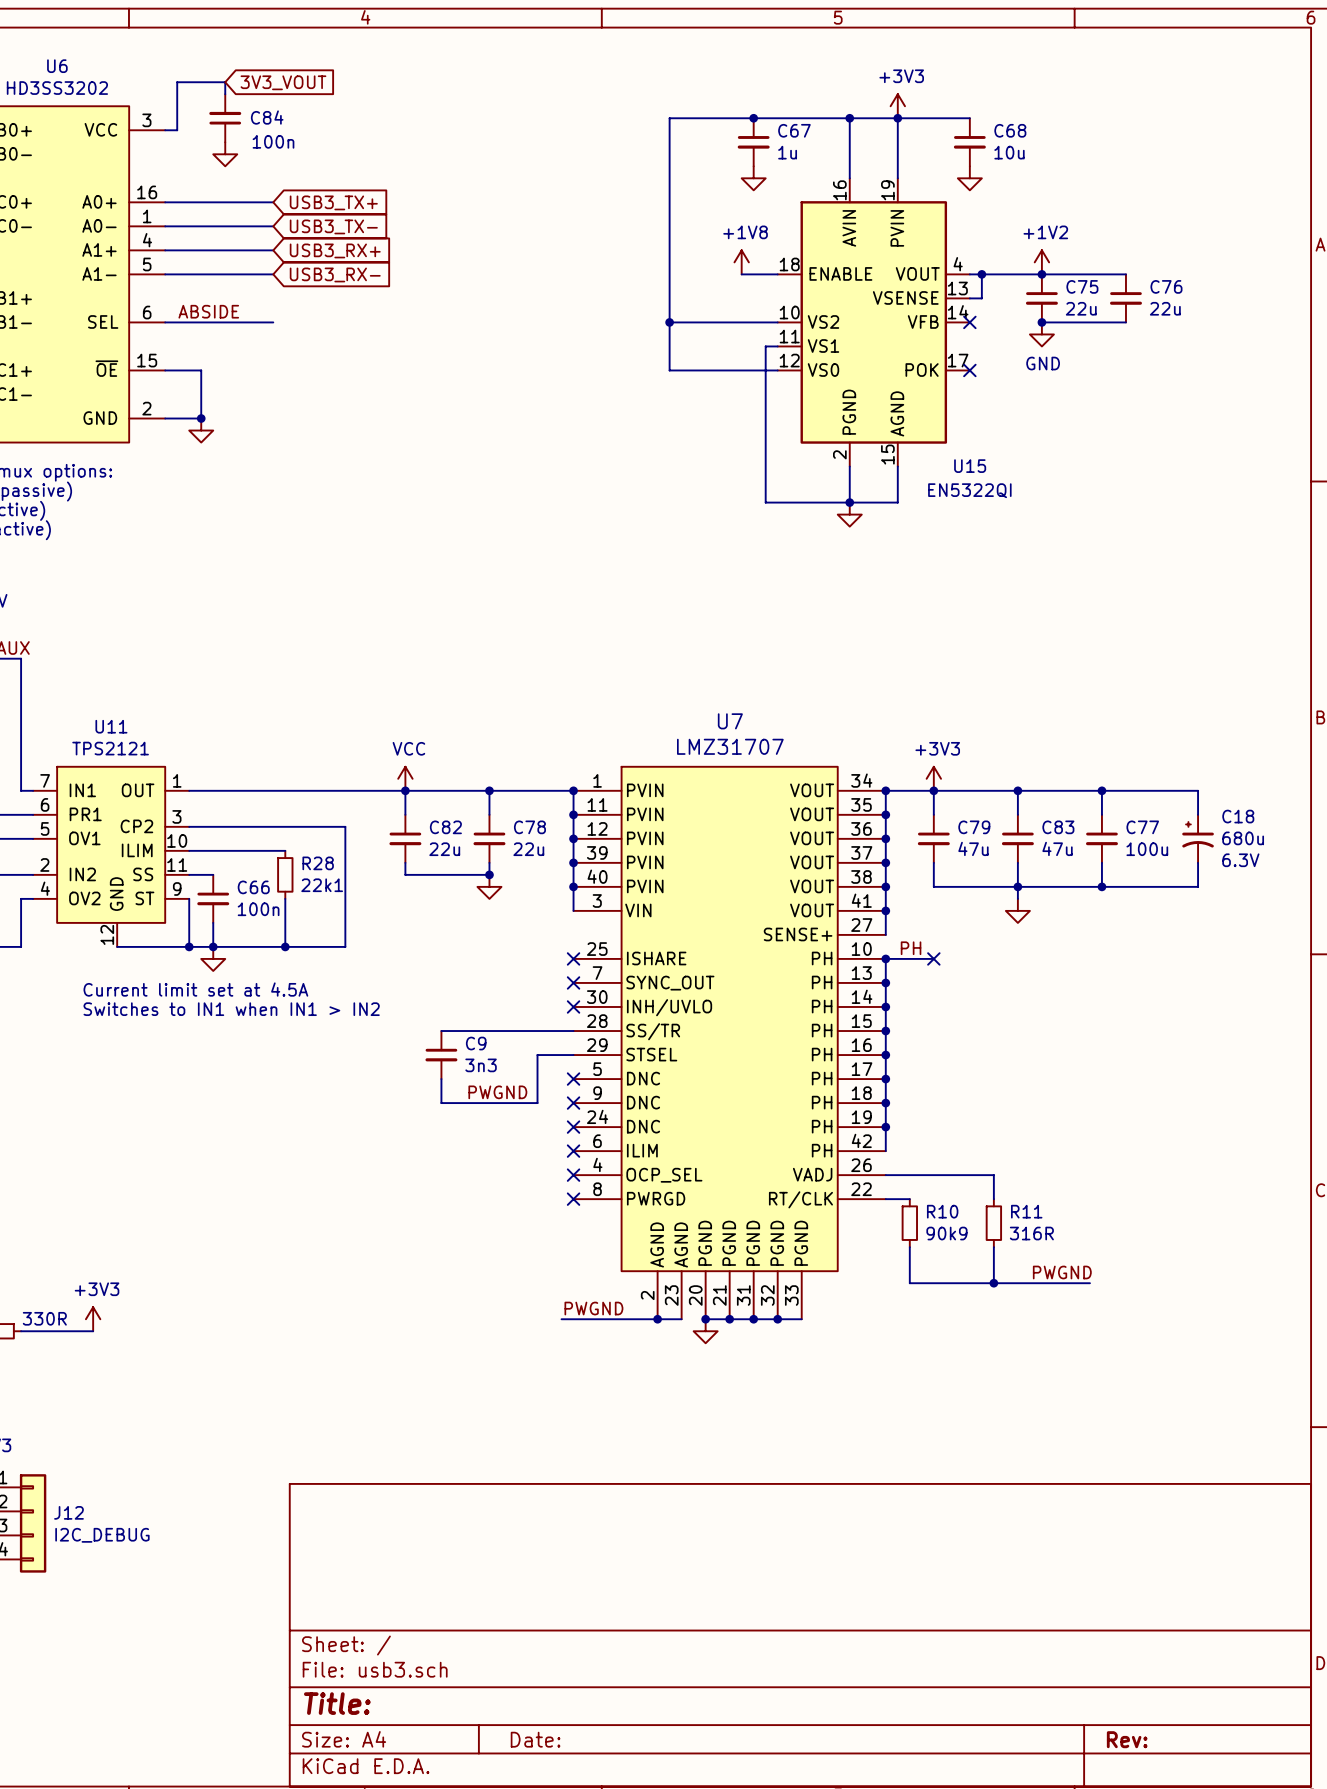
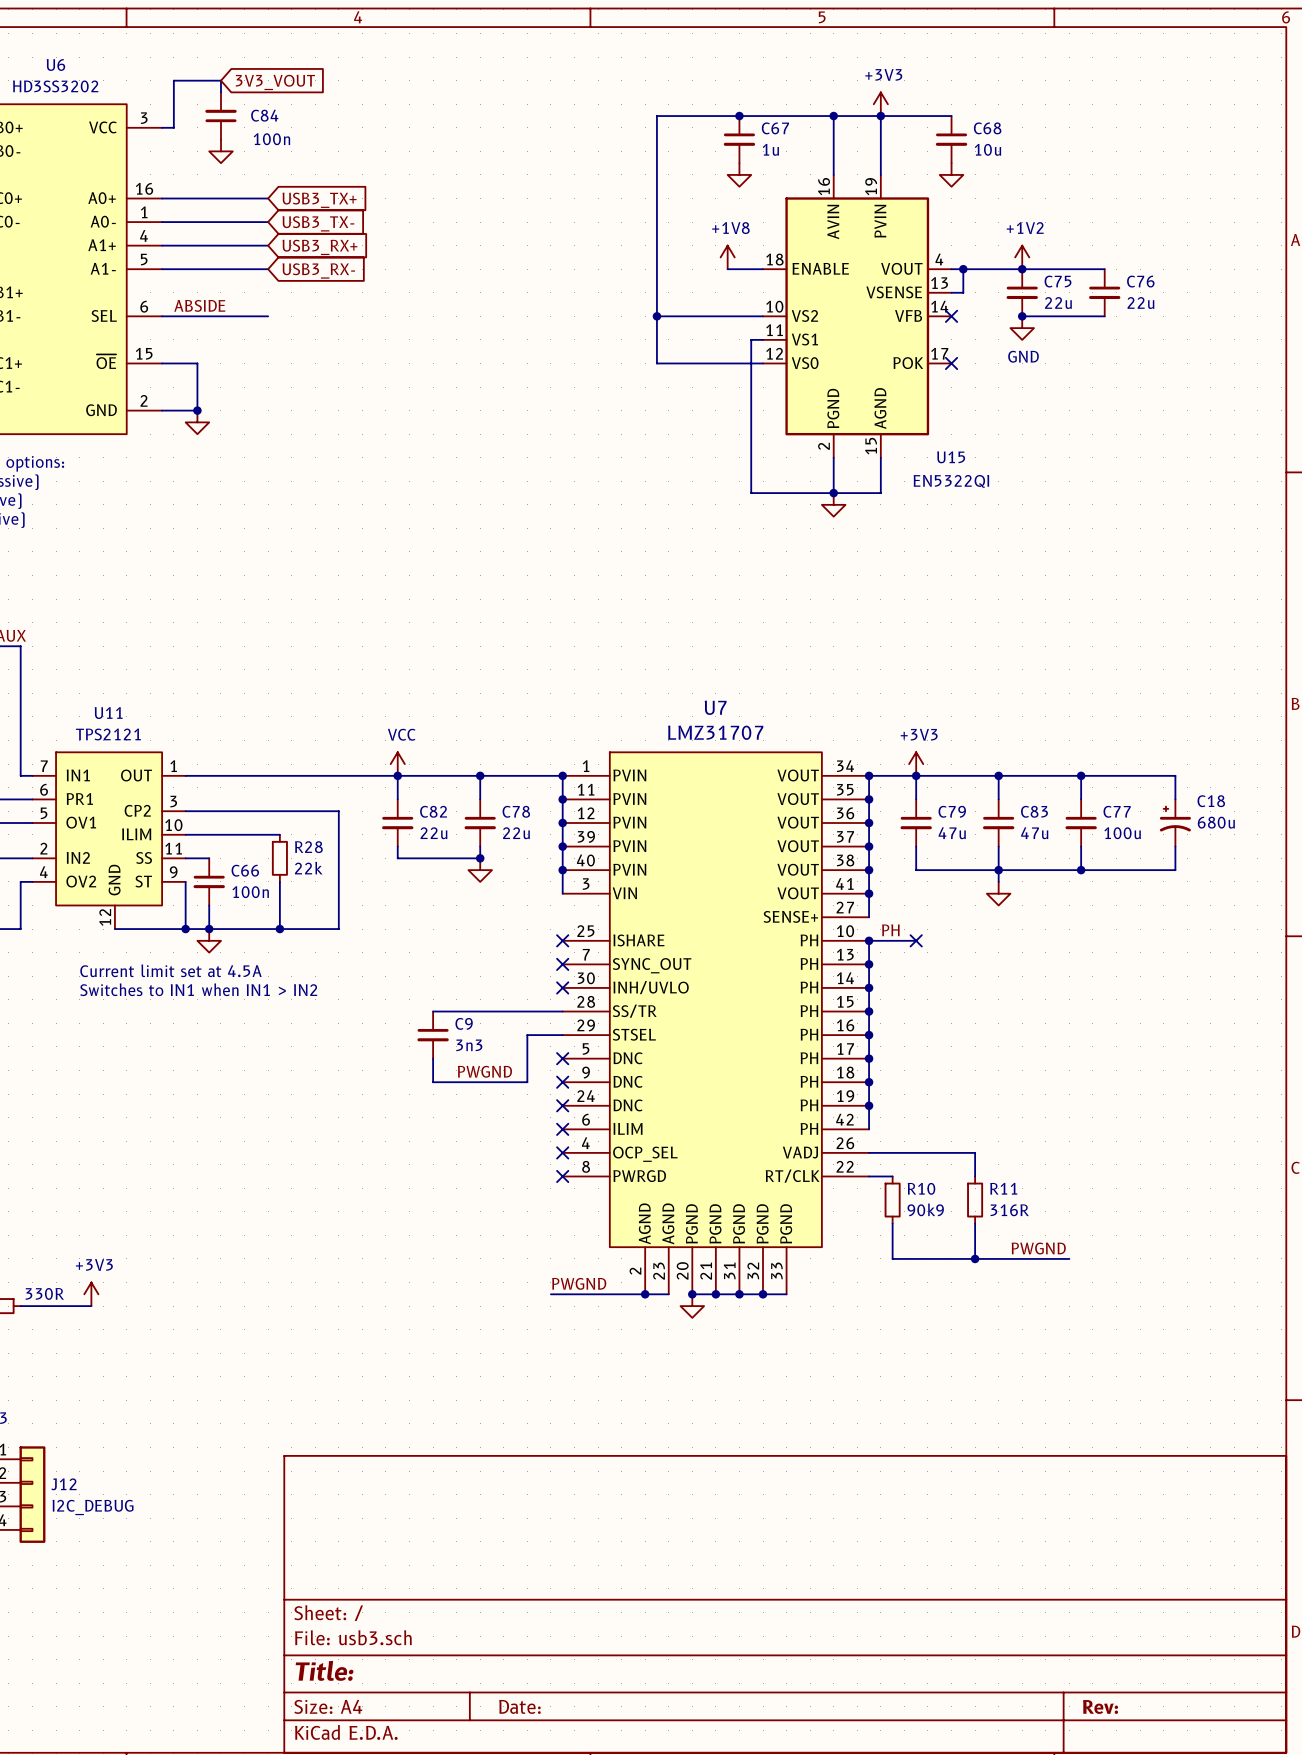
C18 text: 6.3V (1240, 860) -> none
R28 value: 22k1 (322, 885) -> 22k (308, 868)

